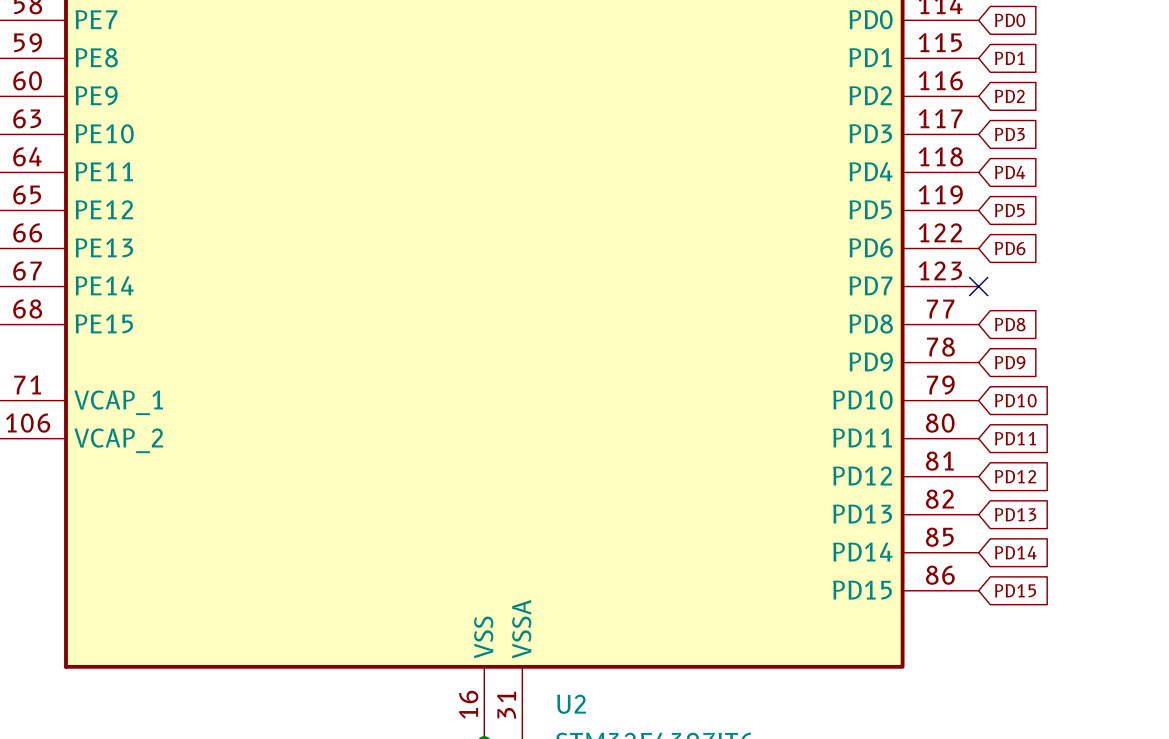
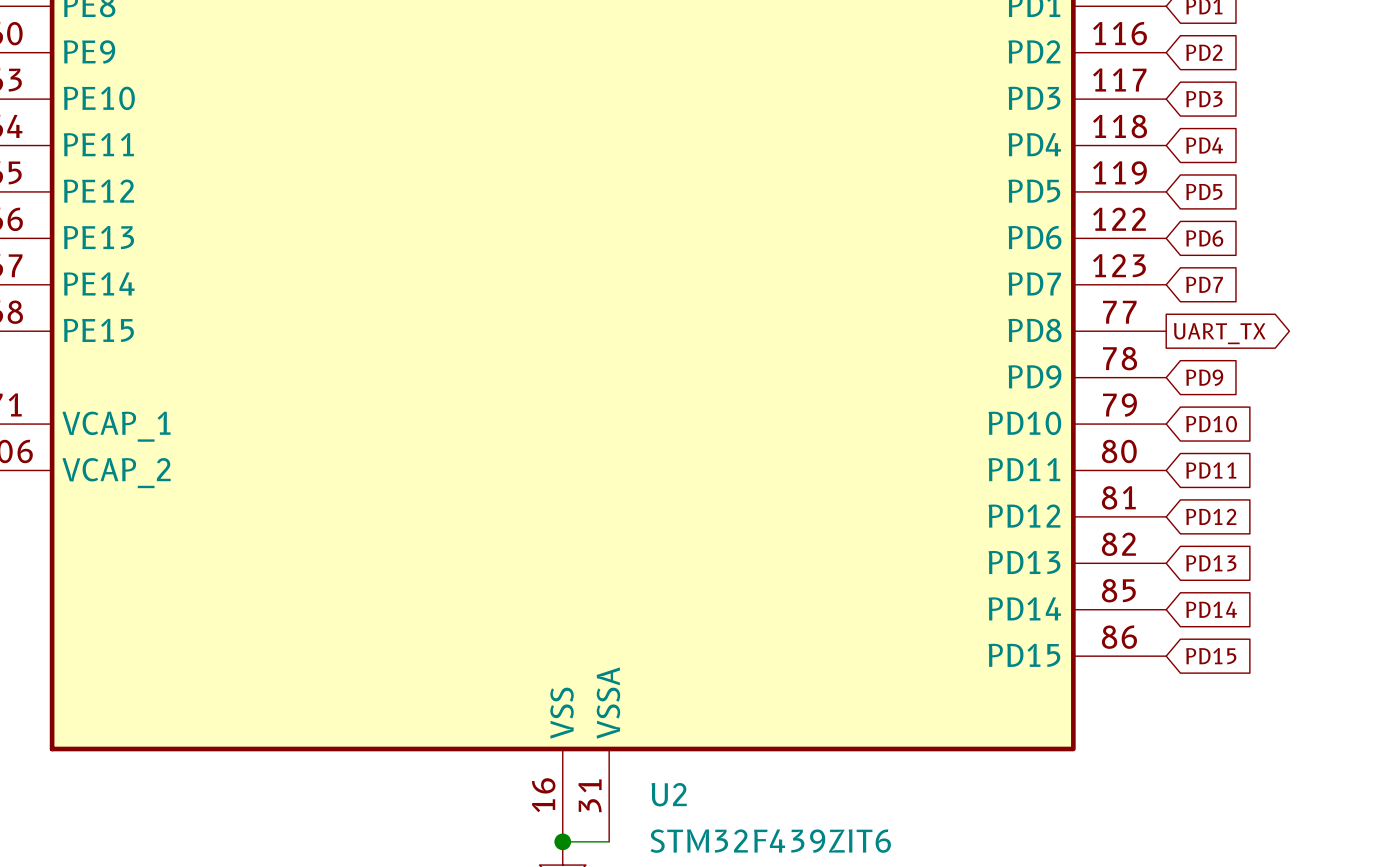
no-connect mark: (978, 286) -> none
global label: none -> PD7 (1204, 284)
global label shape: input (1010, 324) -> output (1219, 333)
global label: PD8 (1010, 324) -> UART_TX (1219, 333)

